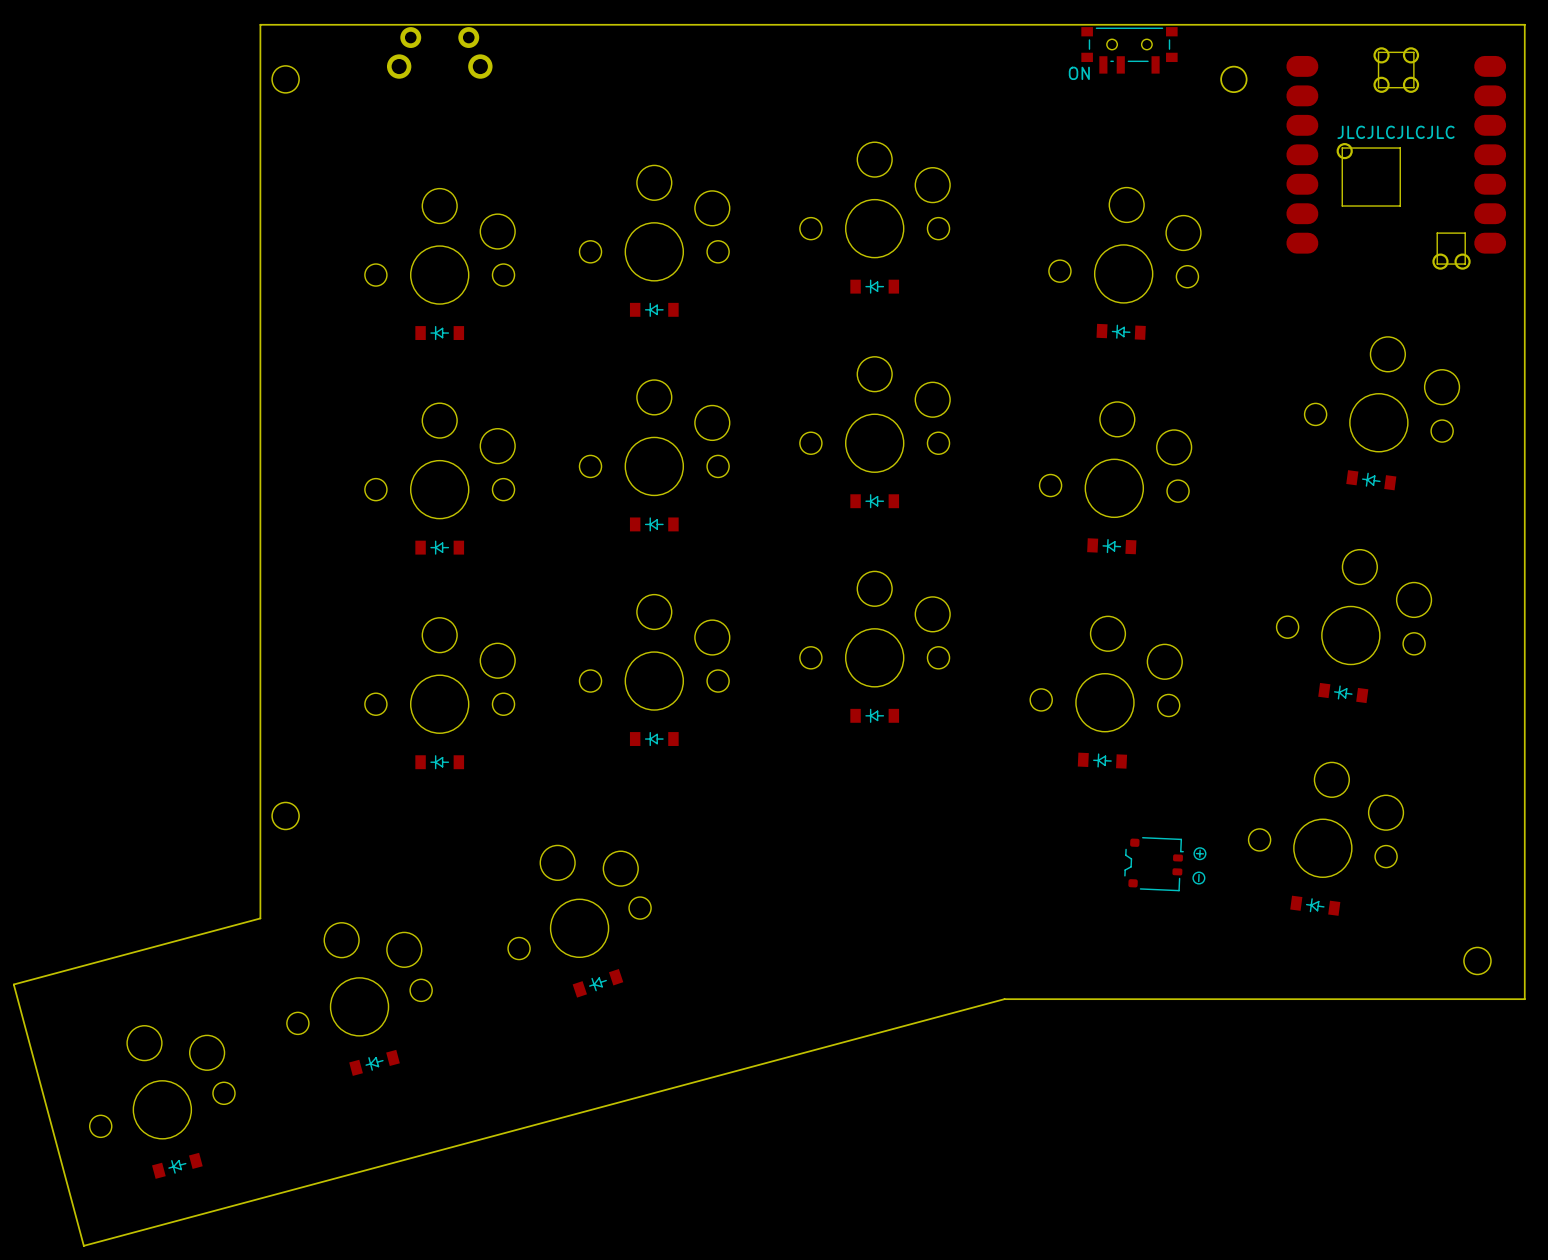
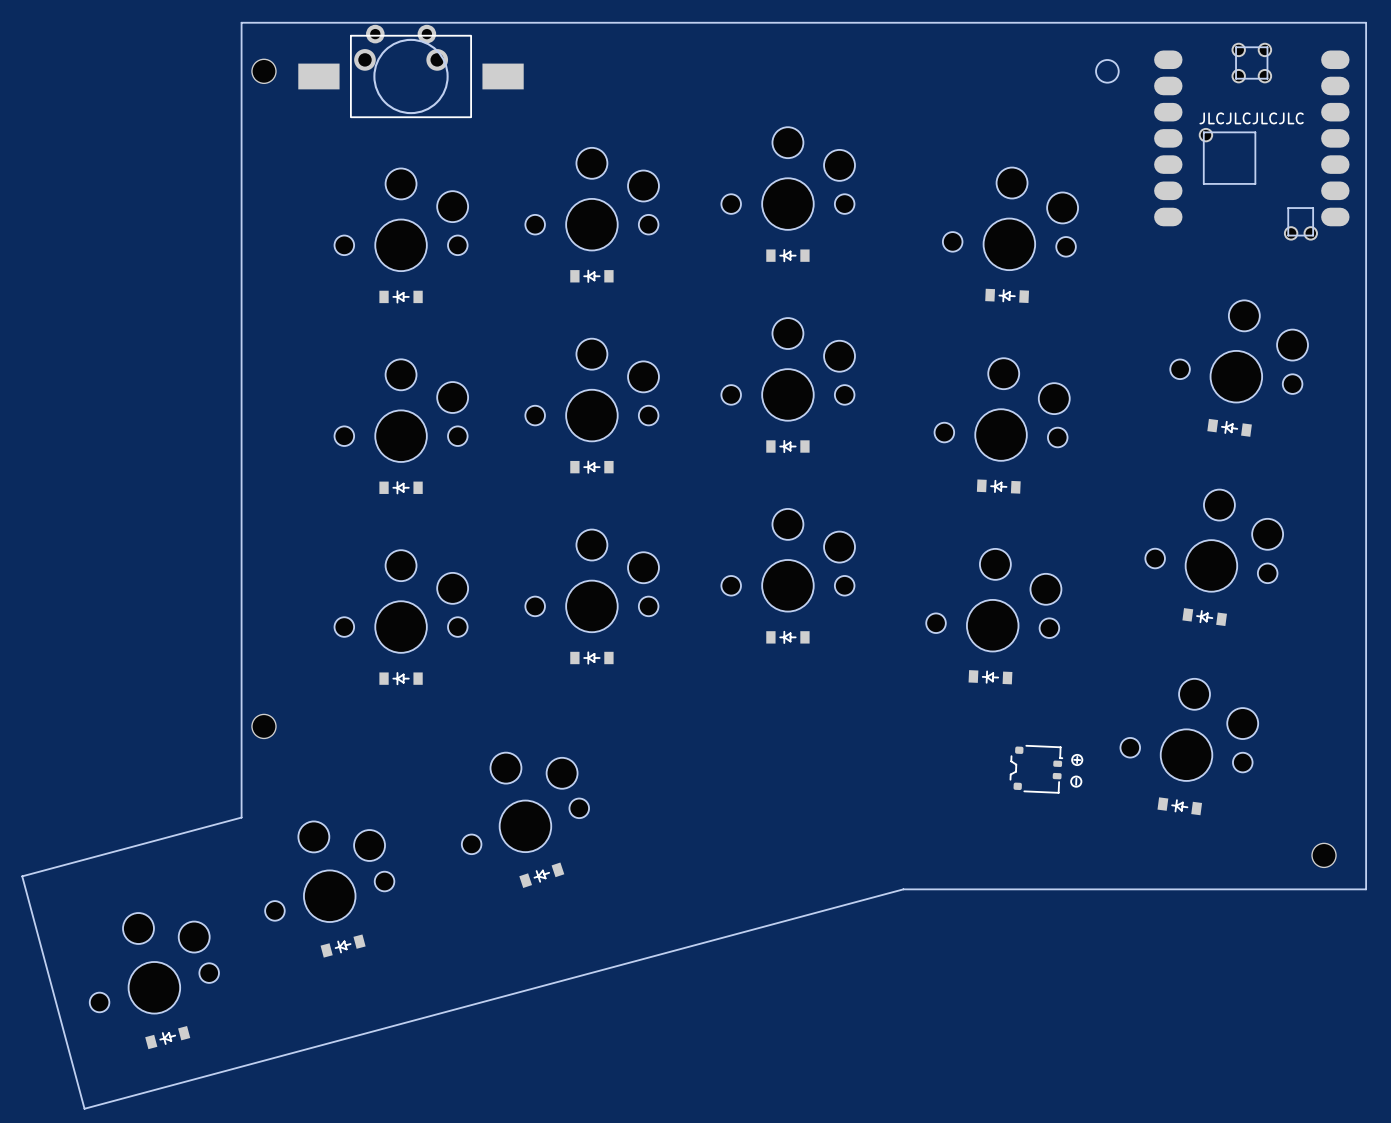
part: (1129, 50) -> none
text: ON (1079, 73) -> none
part: none -> (411, 76)

